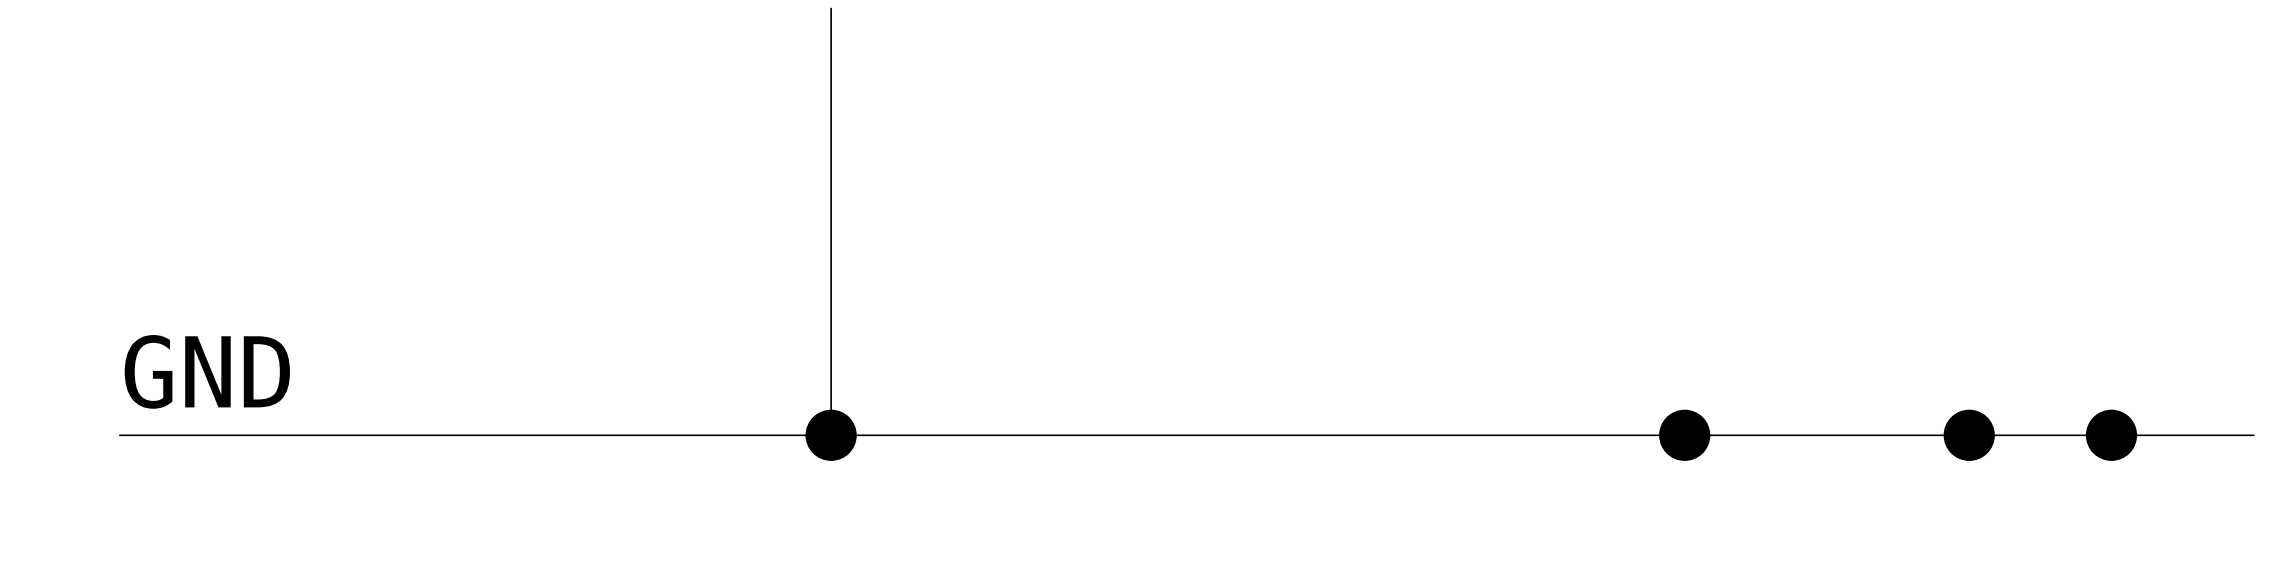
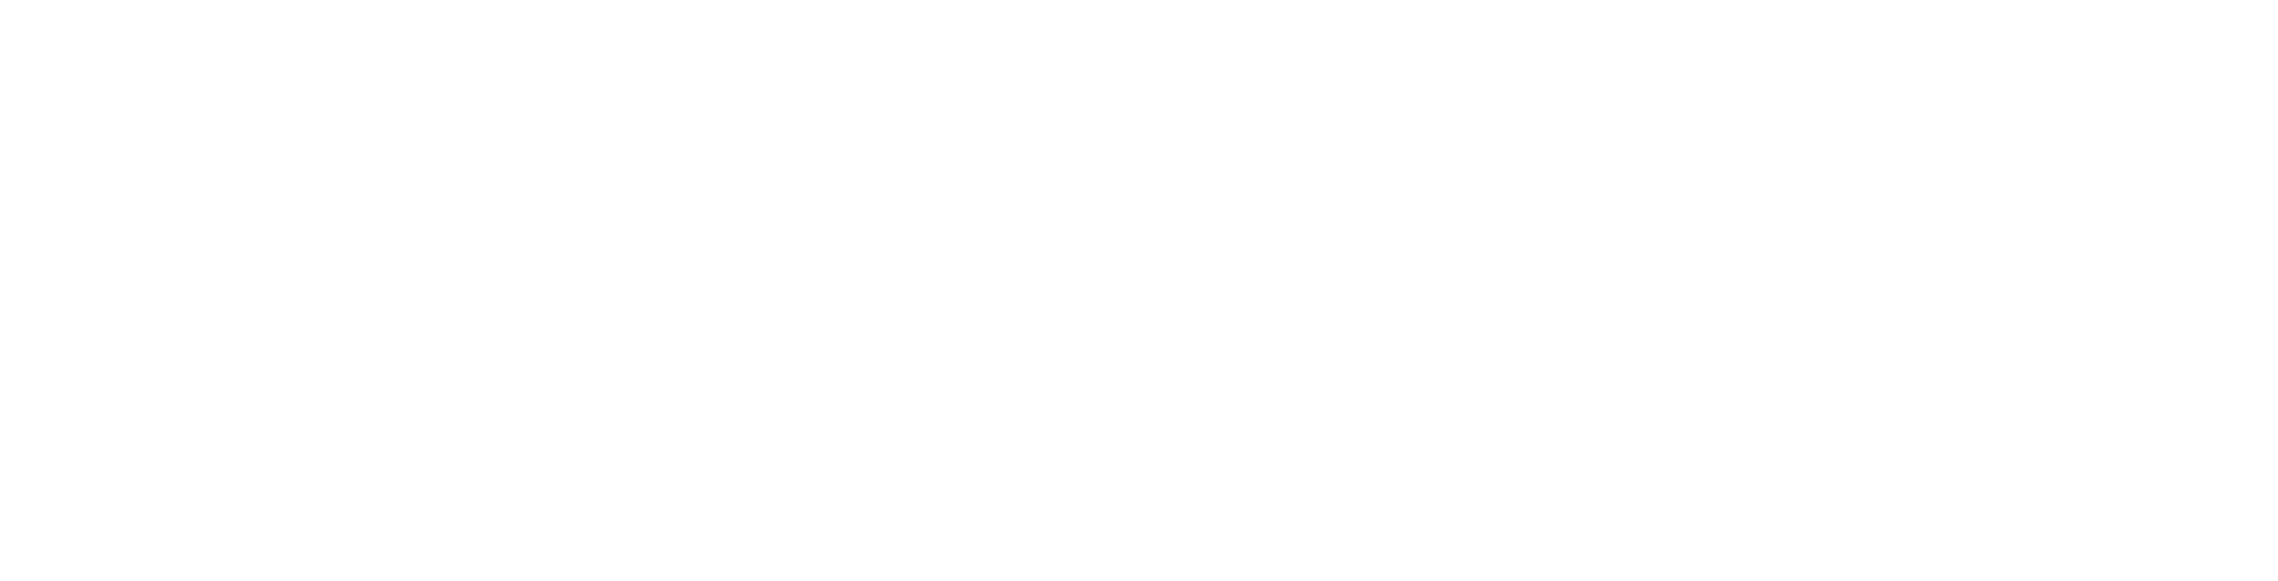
wire: (831, 8) (831, 435) -> none
label: GND (207, 371) -> none
wire: (119, 435) (2253, 435) -> none
junction: (831, 435) -> none
junction: (1684, 435) -> none
junction: (1969, 435) -> none
junction: (2111, 435) -> none

